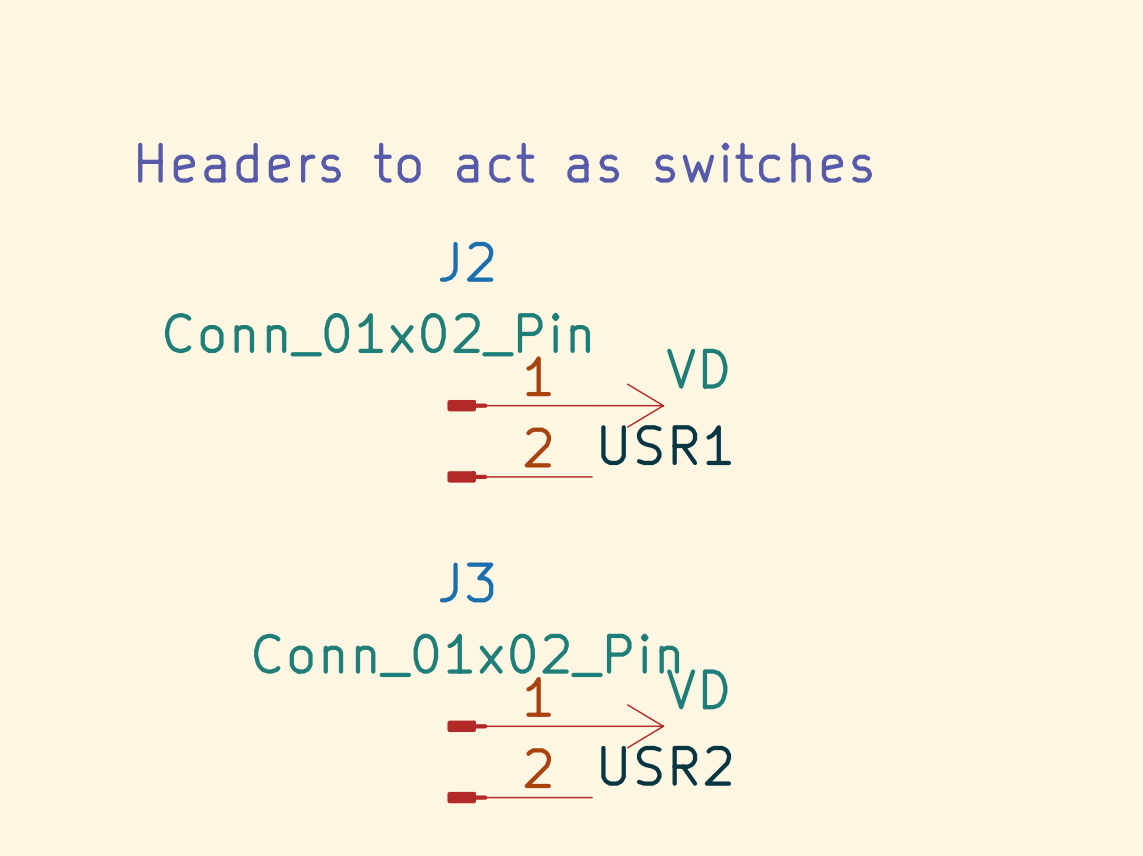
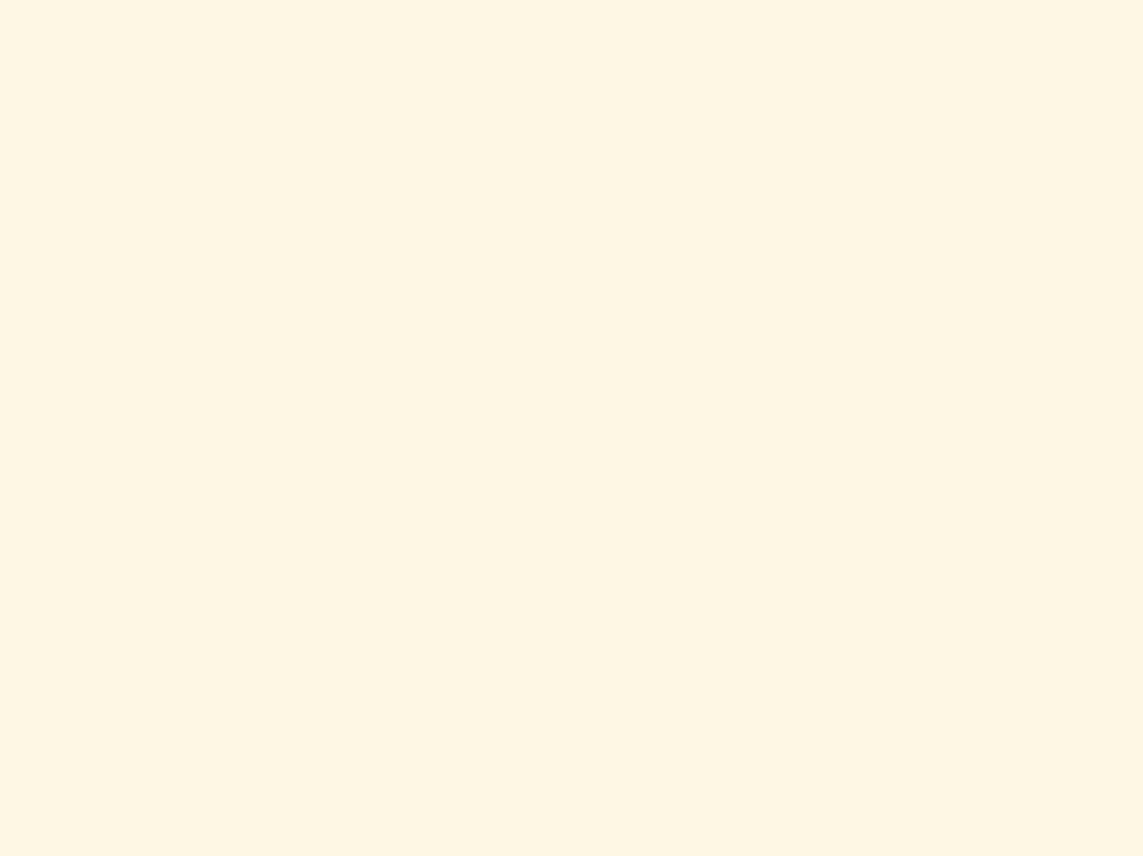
text: Headers to act as switches (505, 162) -> none
power symbol: VD (627, 405) -> none
J2: Conn_01x02_Pin (519, 441) -> none
label: USR1 (666, 445) -> none
power symbol: VD (627, 726) -> none
J3: Conn_01x02_Pin (519, 761) -> none
label: USR2 (666, 765) -> none

